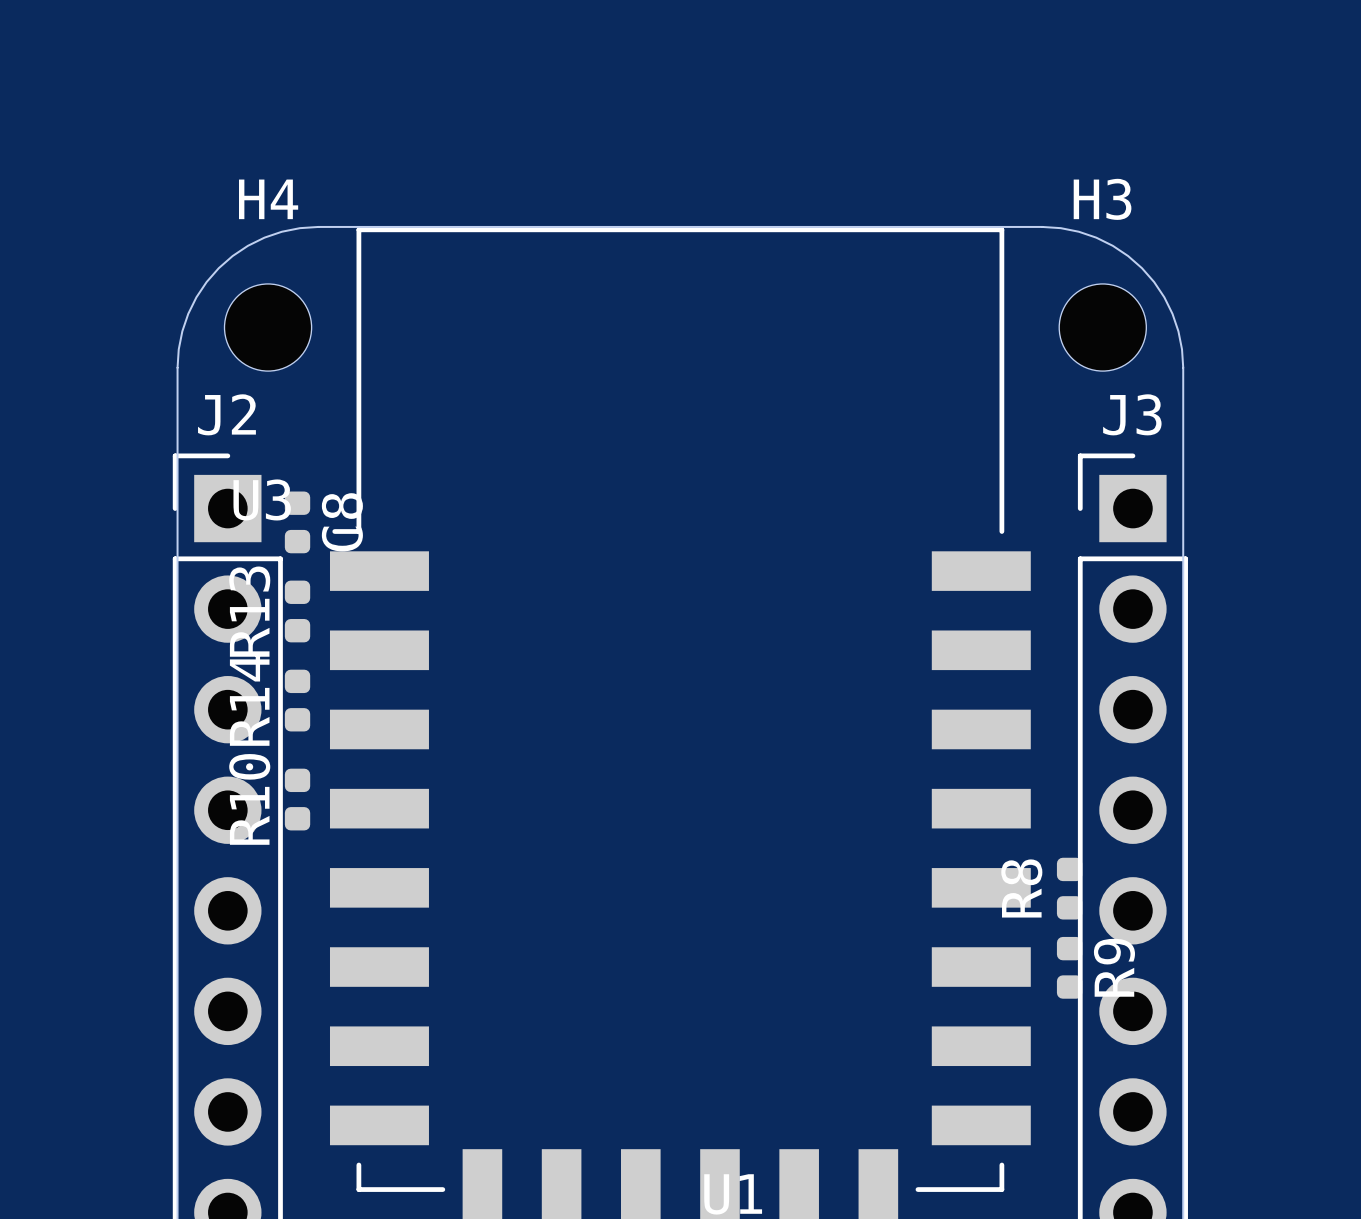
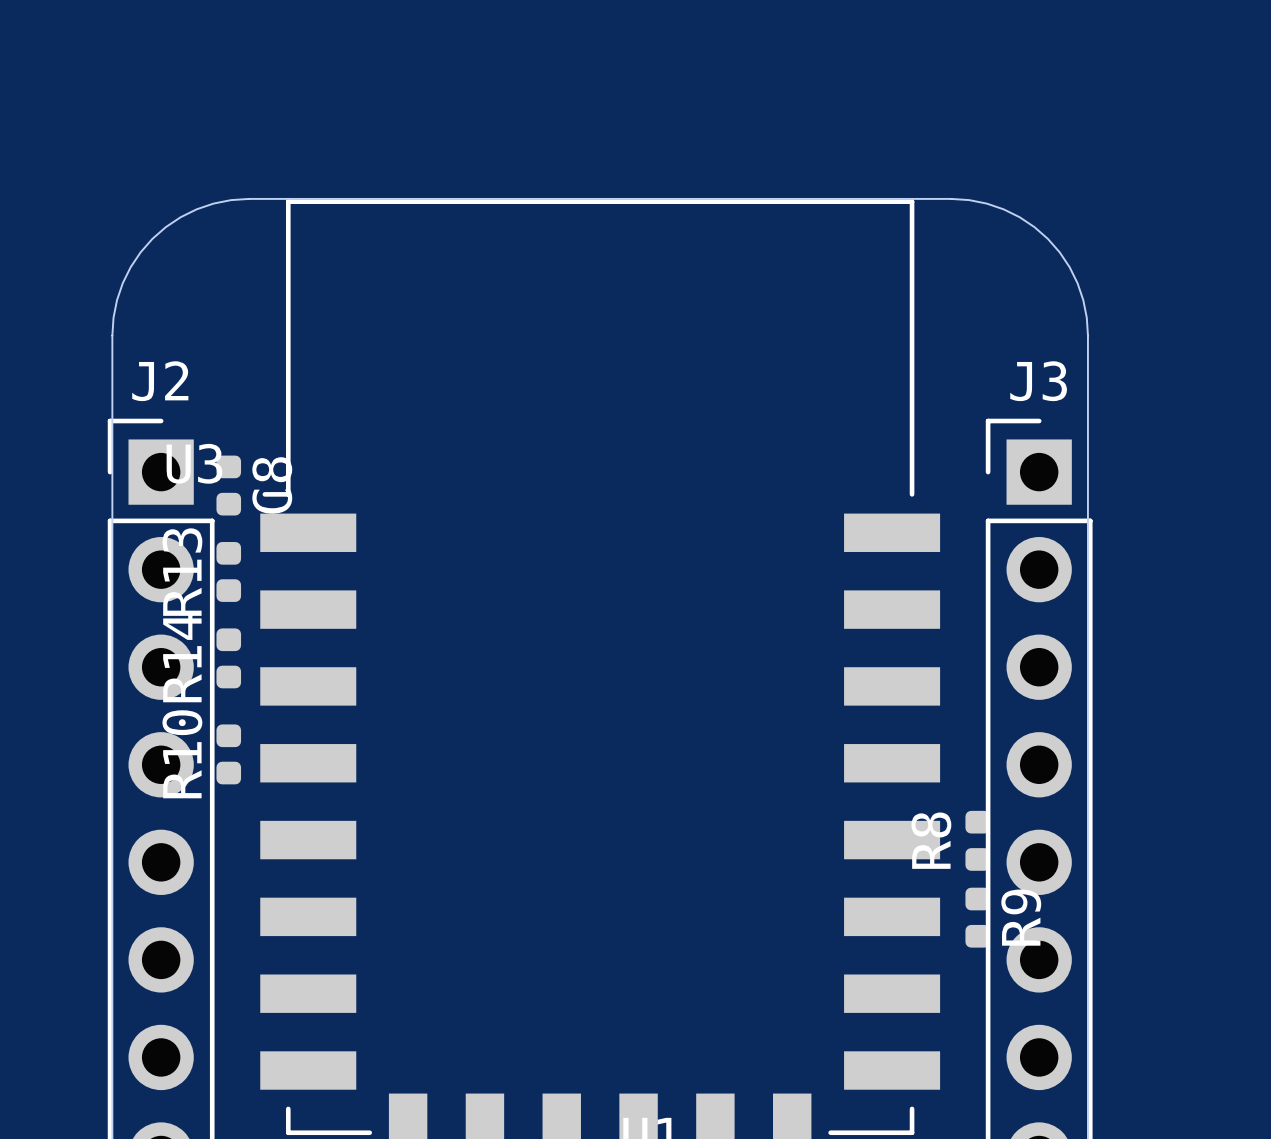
H4: (268, 327) -> none
H3: (1102, 327) -> none

